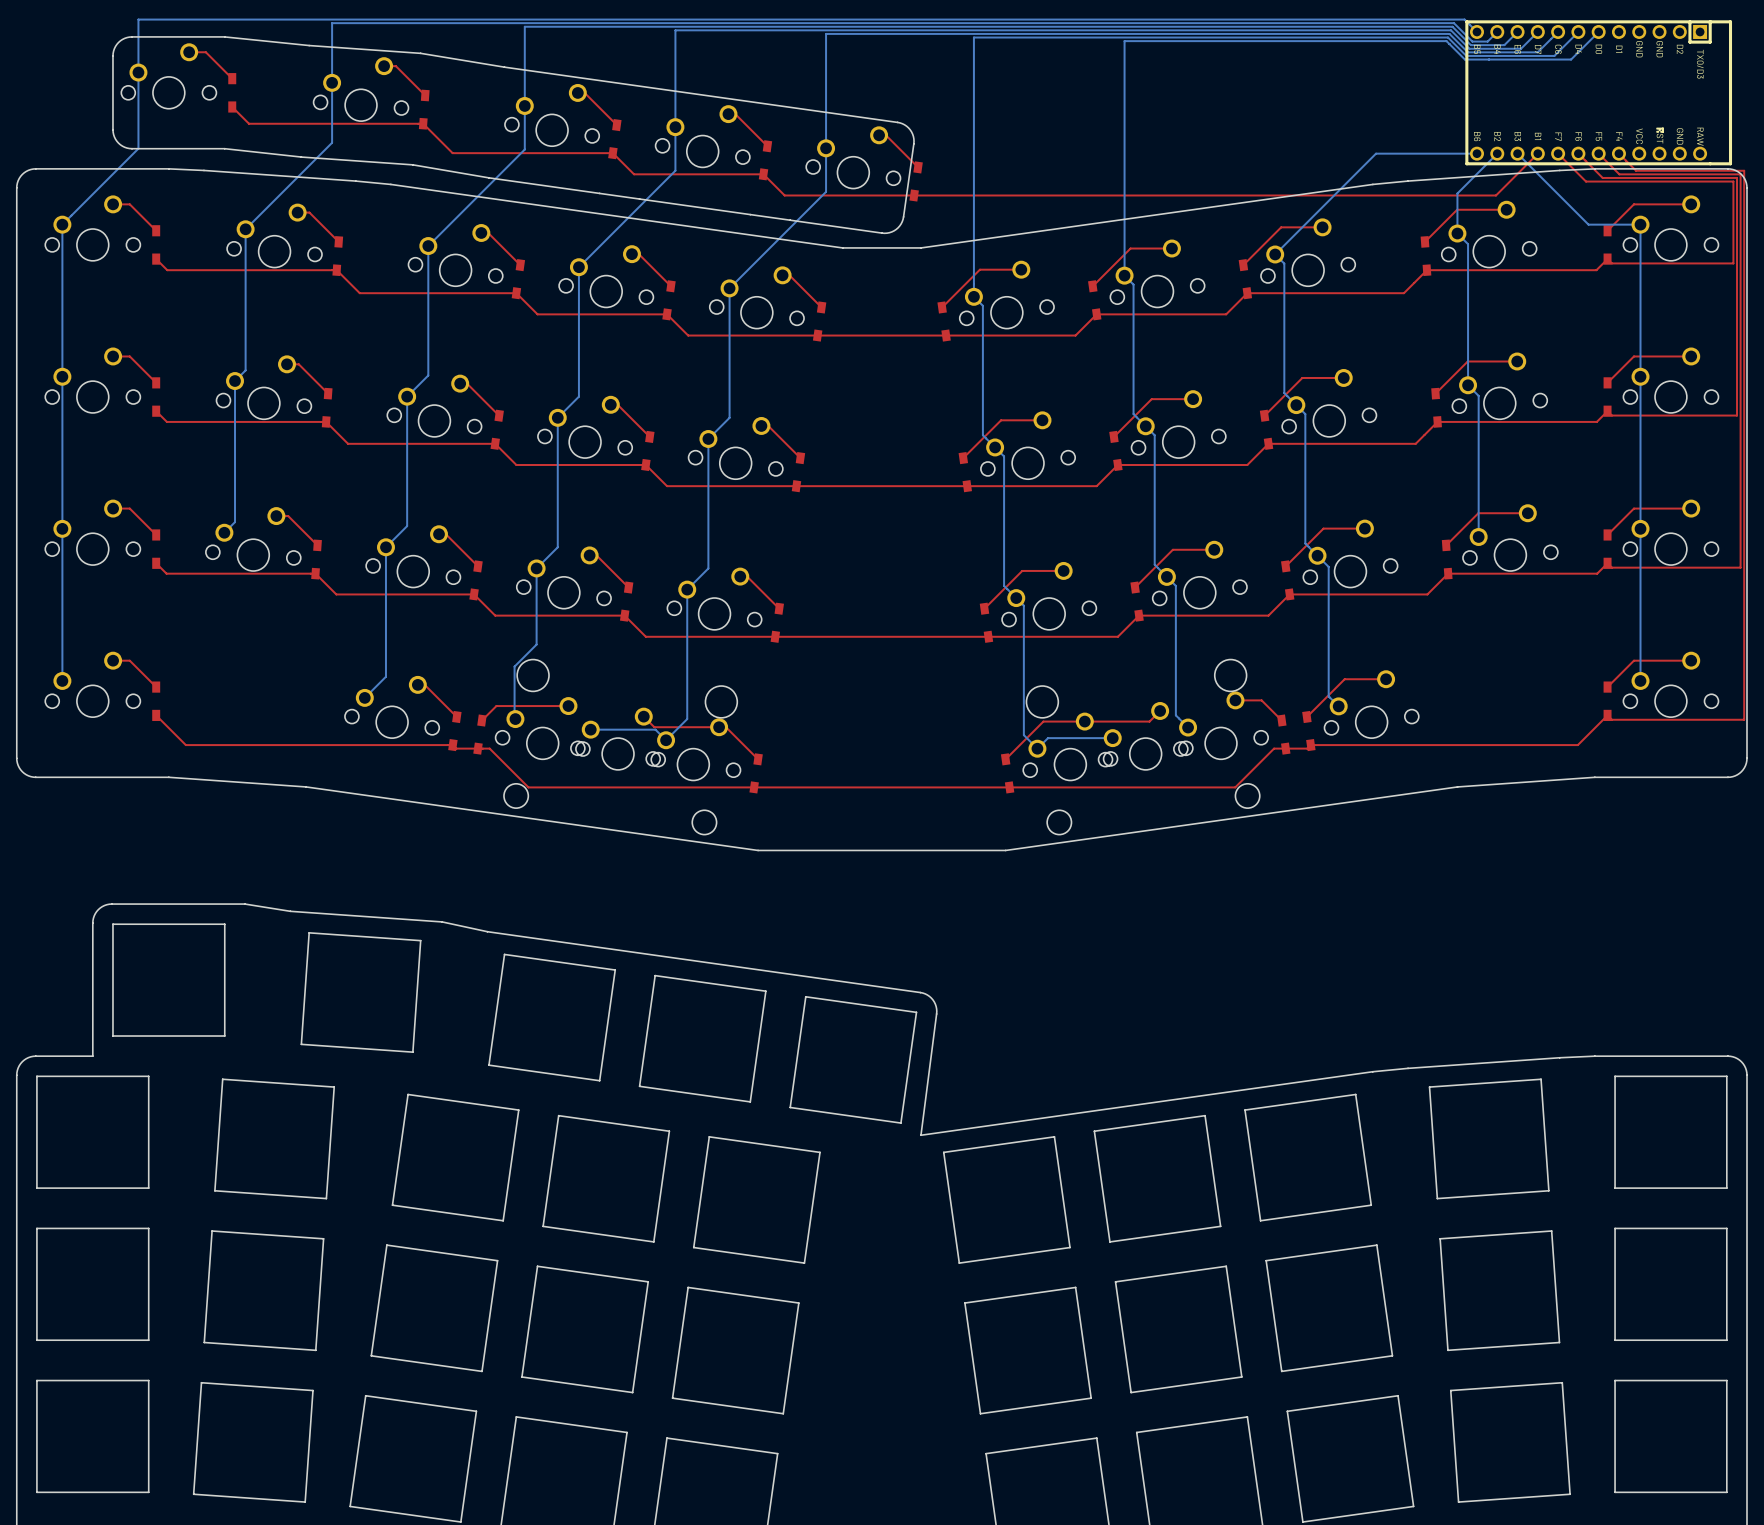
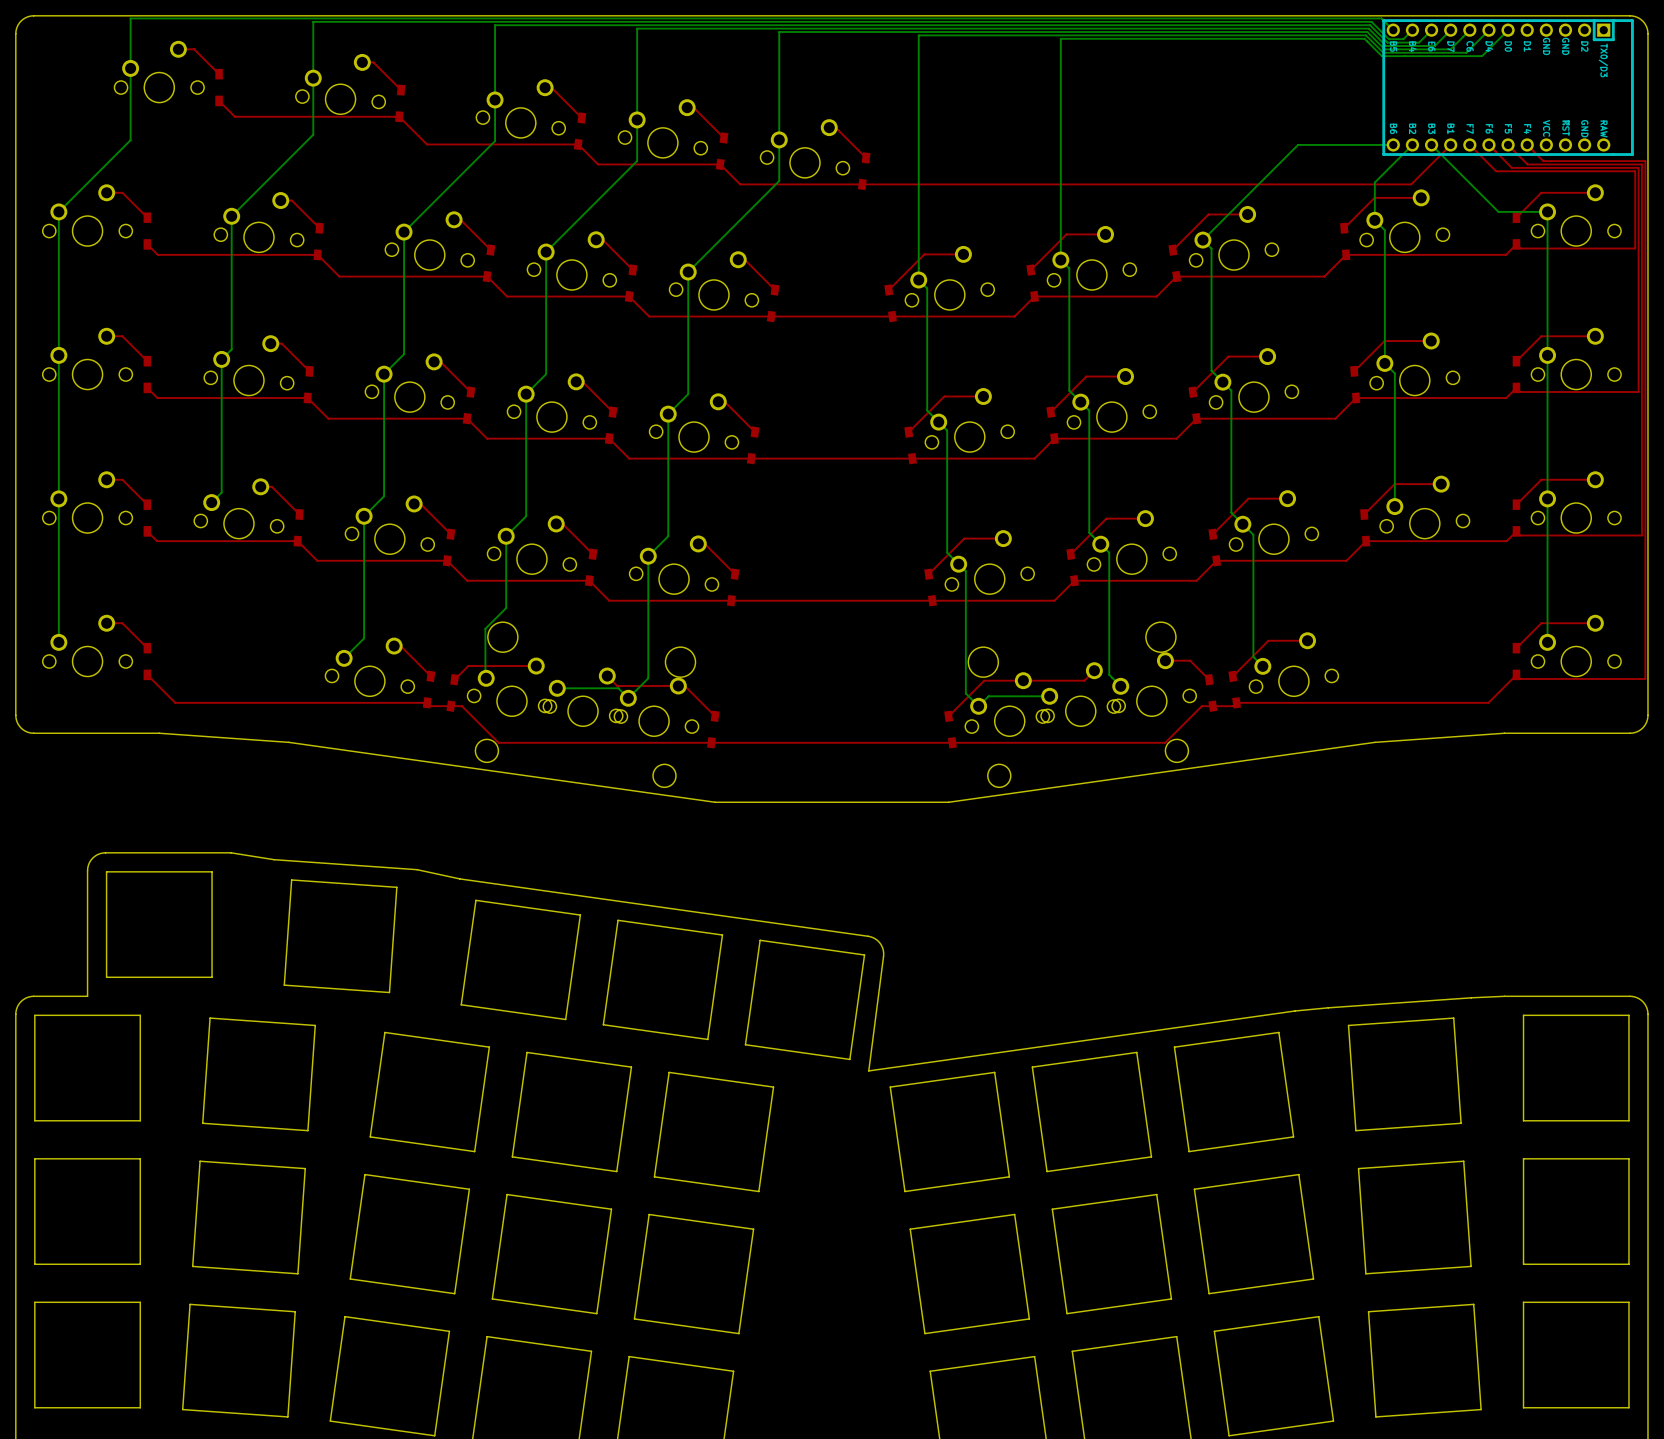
board edge: (224, 36) (309, 45) (420, 53) (504, 67) (900, 122) (910, 129) (914, 141) (903, 219) (894, 230) (882, 233) (488, 177) (412, 164) (301, 157) (224, 148) (129, 148) (118, 143) (112, 129) (112, 55) (118, 42) (131, 36) (224, 36) -> none
board edge: (1746, 187) (1743, 176) (1730, 169) (1559, 170) (1372, 184) (920, 247) (842, 247) (355, 181) (168, 168) (35, 168) (22, 174) (16, 187) -> (1647, 177) (1647, 31) (1640, 19) (1630, 15) (31, 15) (21, 21) (15, 31) (15, 177)

